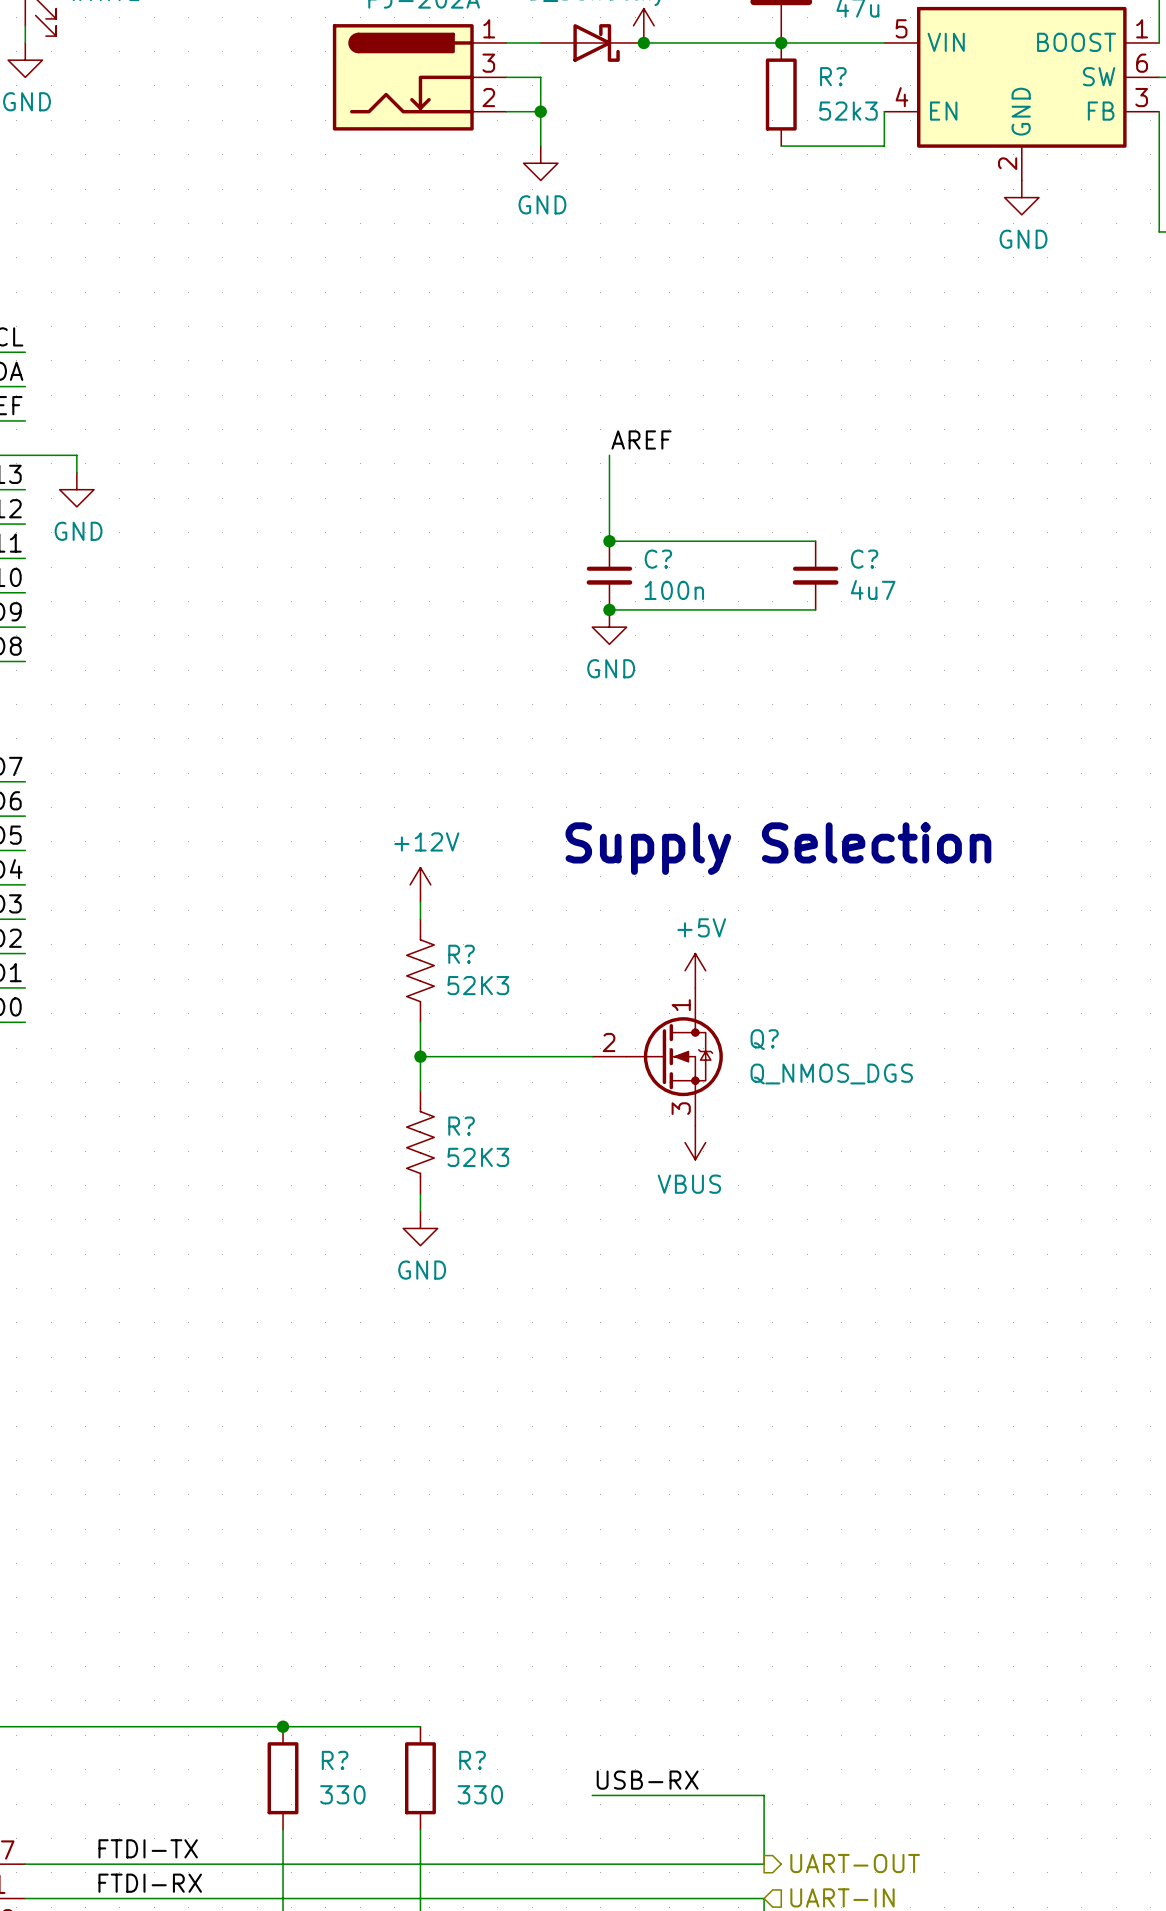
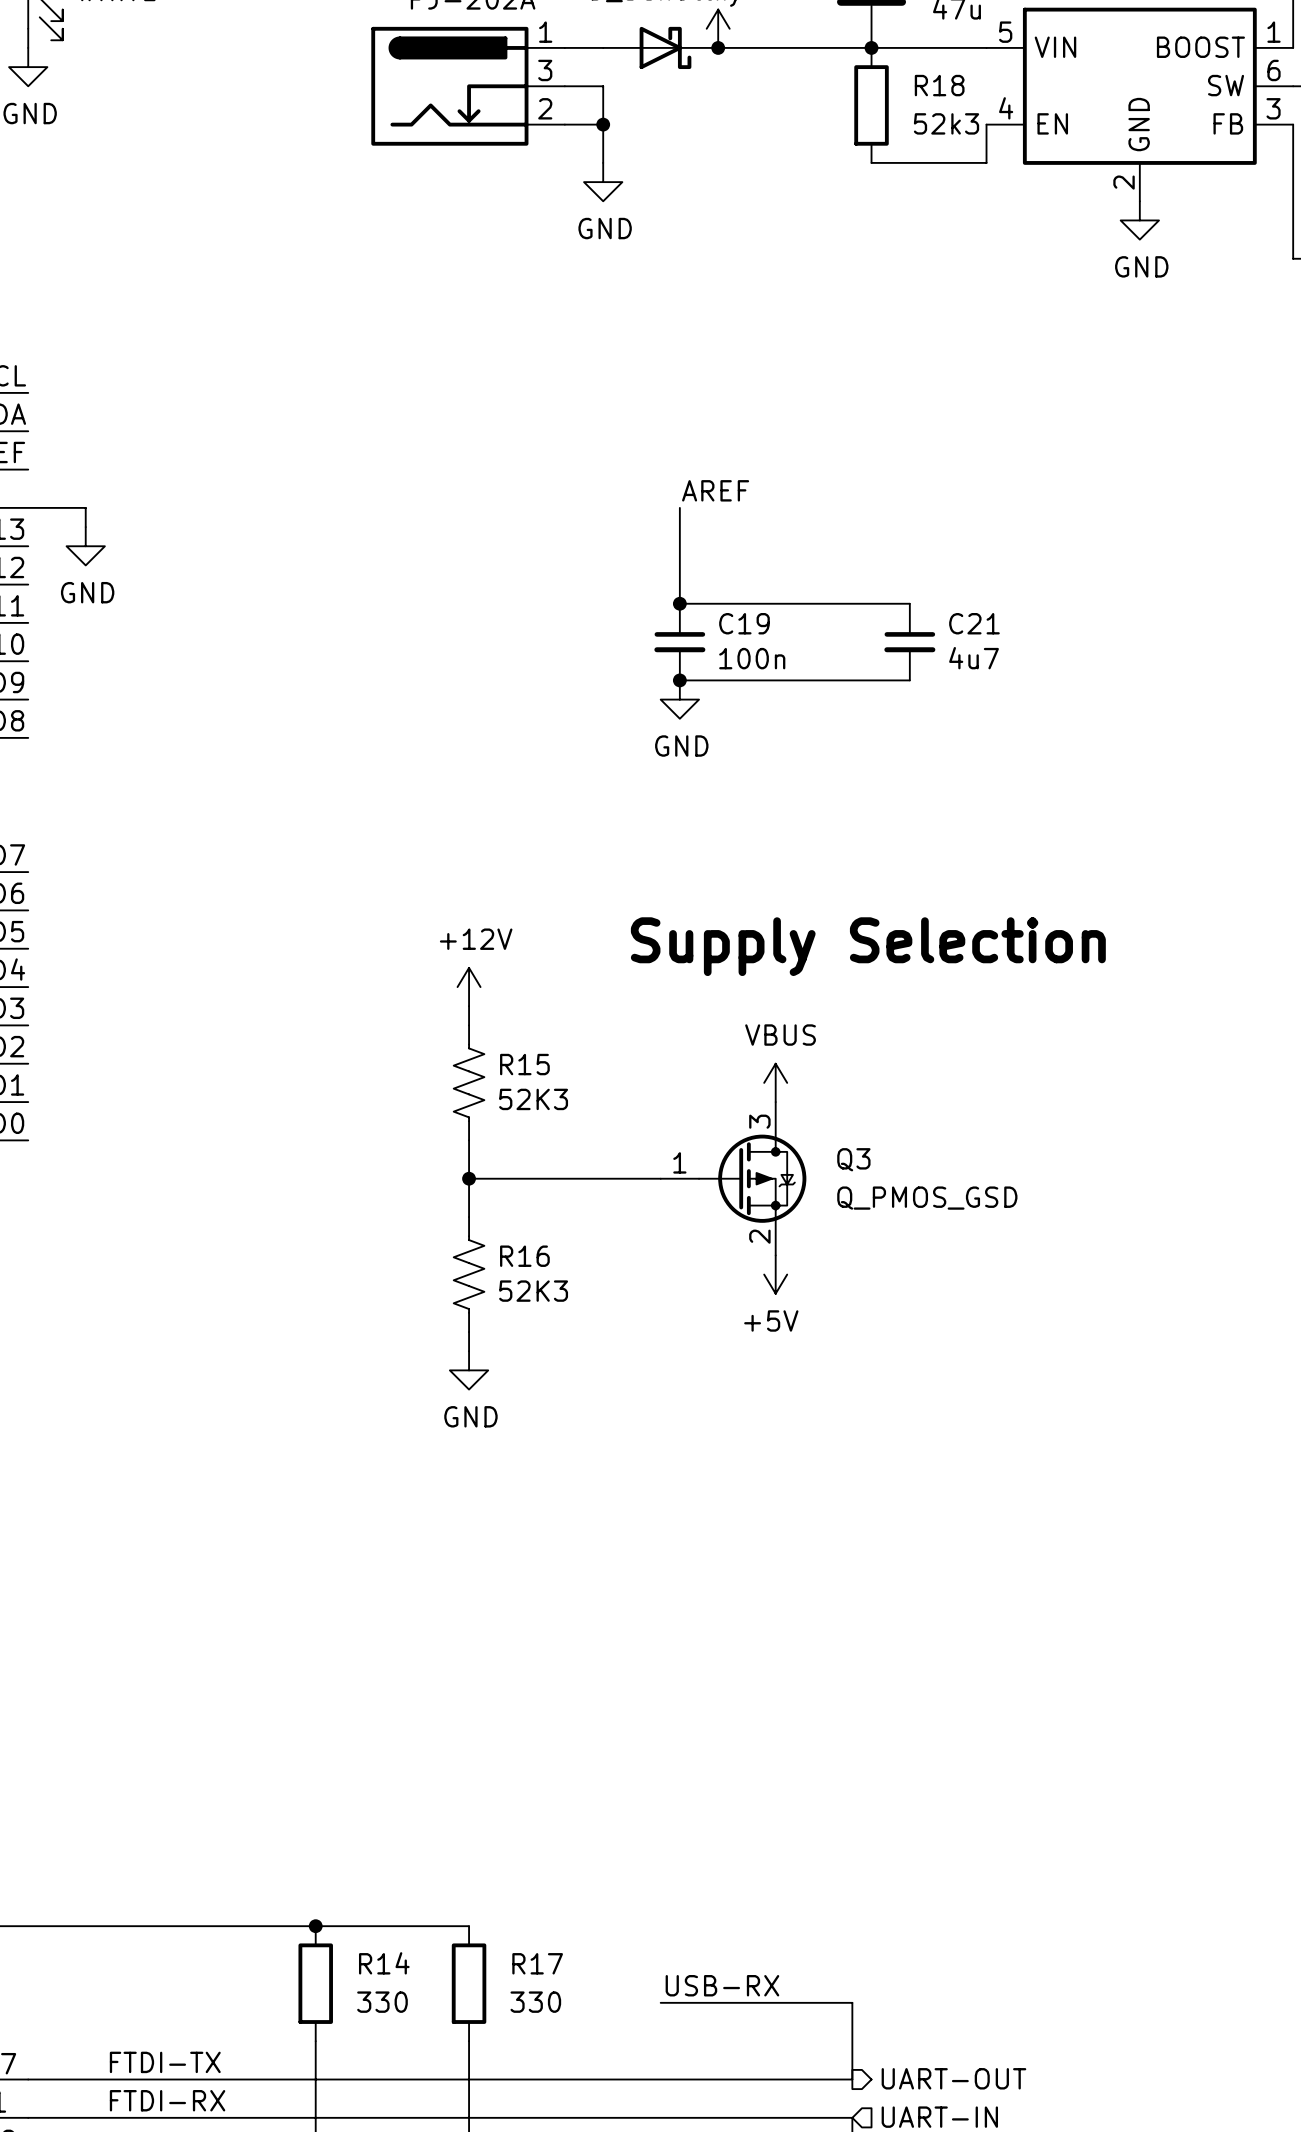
R? name: R? (833, 76) -> R18 (939, 85)
C? name: C? (658, 559) -> C19 (744, 623)
C? name: C? (864, 559) -> C21 (974, 623)
R? name: R? (461, 954) -> R15 (524, 1064)
power symbol: +5V (695, 970) -> VBUS (775, 1082)
Q?: Q_NMOS_DGS (657, 1056) -> none
Q3: none -> Q_PMOS_GSD (733, 1178)
R? name: R? (461, 1126) -> R16 (524, 1256)
power symbol: VBUS (695, 1142) -> +5V (775, 1274)
R? name: R? (335, 1760) -> R14 (384, 1963)
R? name: R? (472, 1760) -> R17 (537, 1963)

